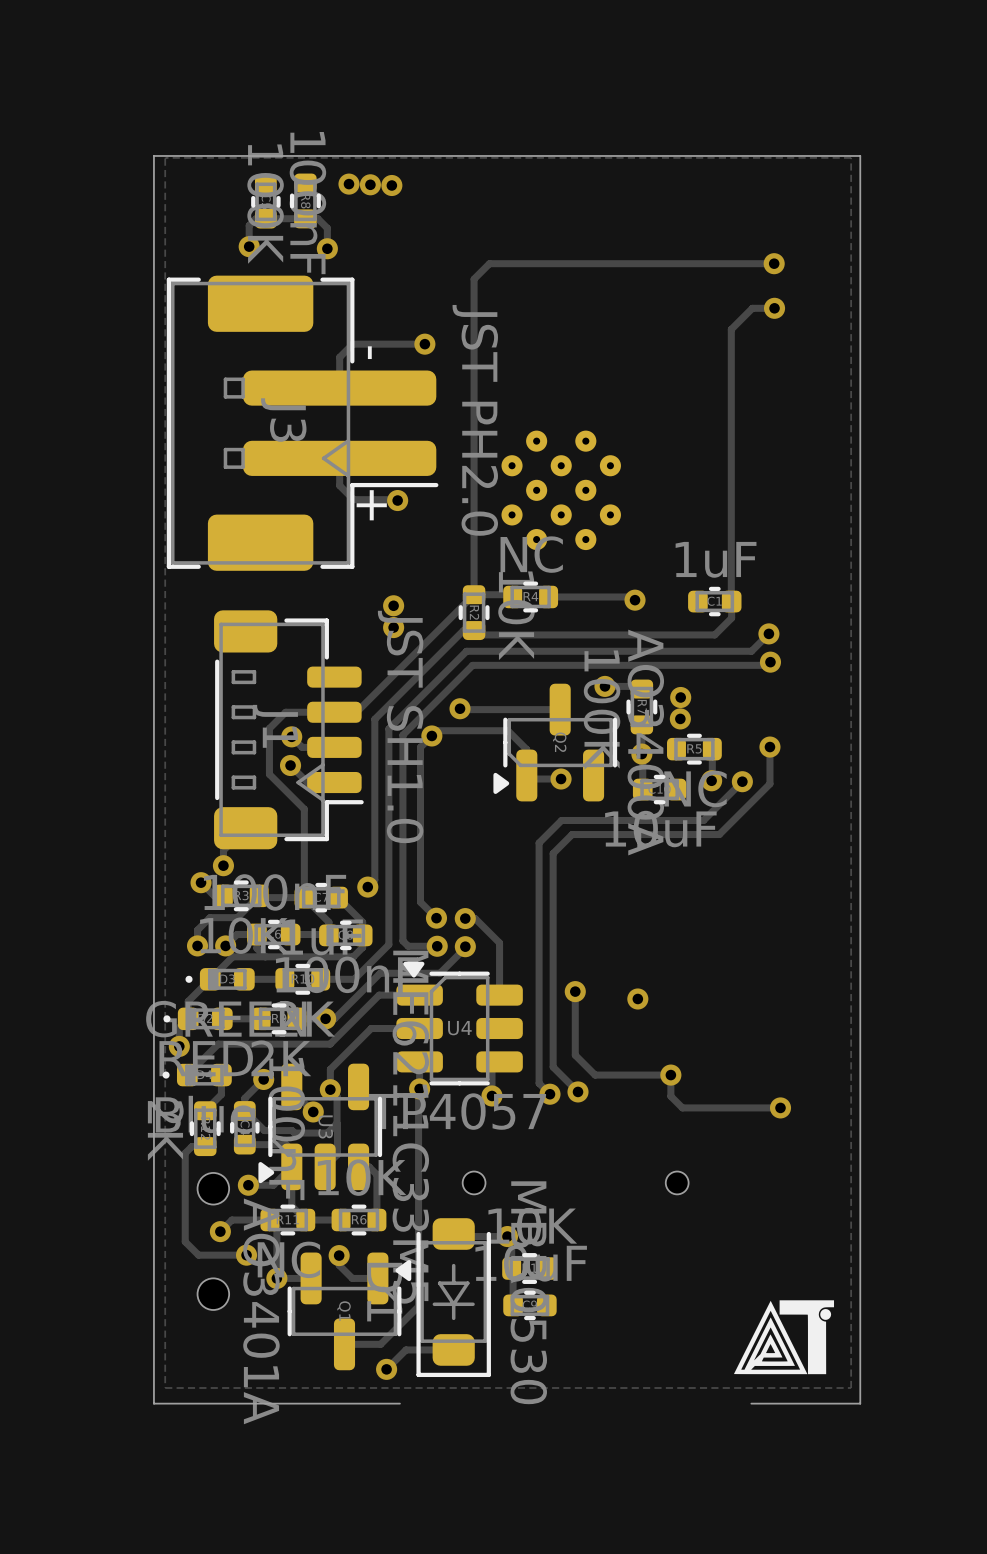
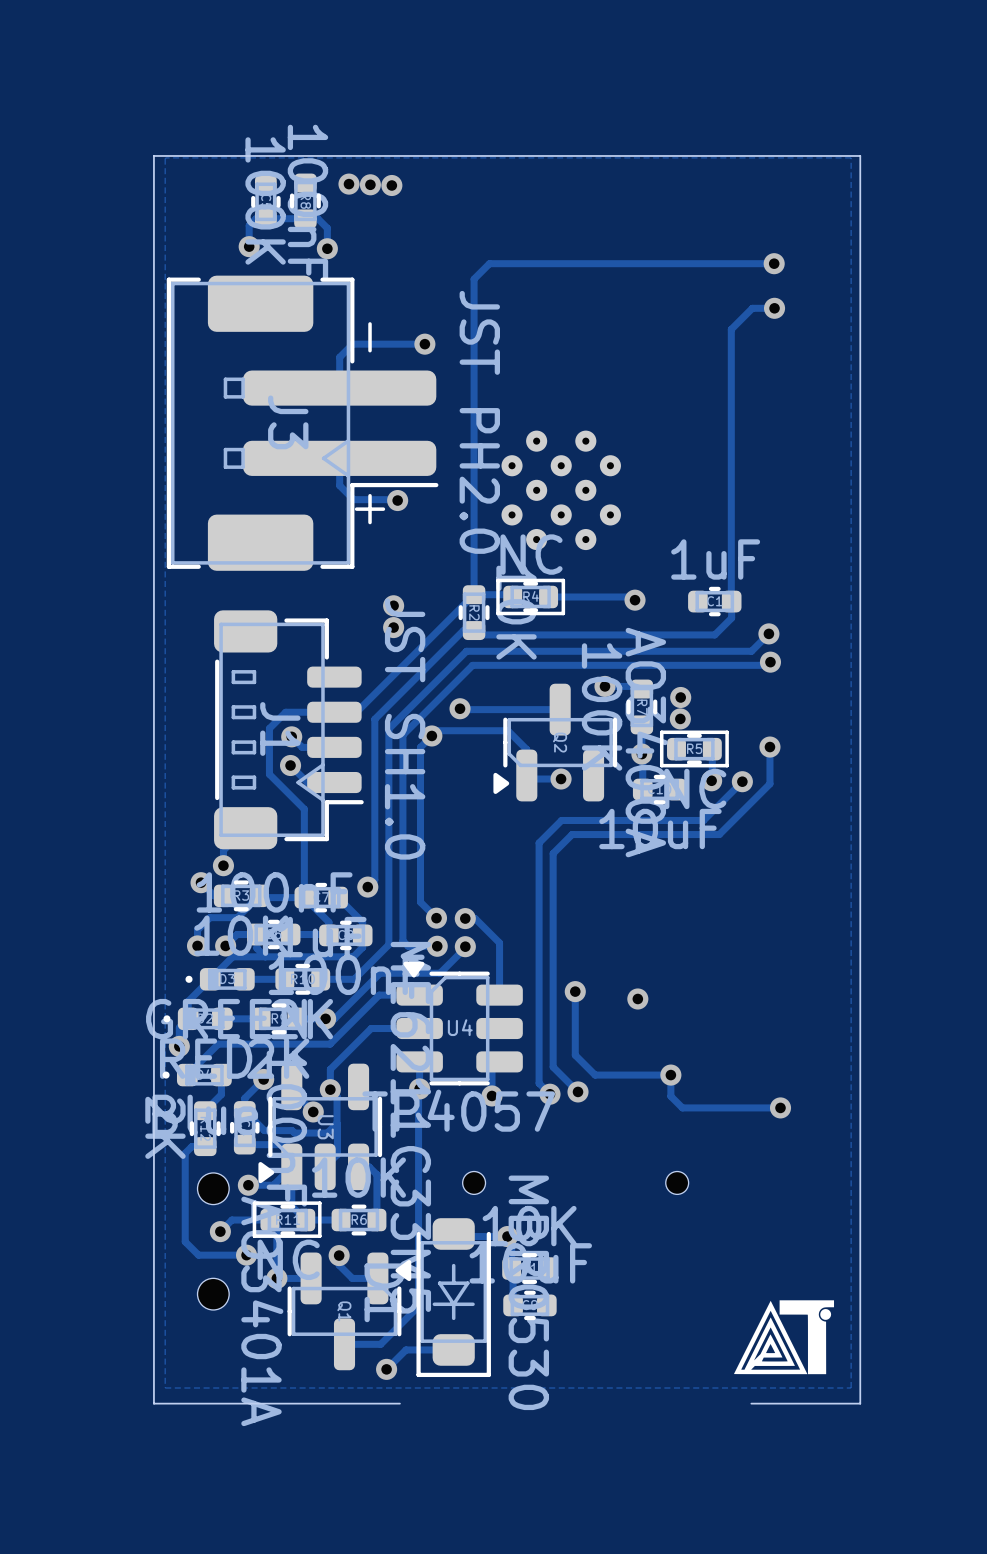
line: none -> (563, 580) (497, 580) (497, 613) (563, 613) (563, 580)
line: none -> (727, 732) (661, 732) (661, 765) (727, 765) (727, 732)
line: none -> (319, 1203) (254, 1203) (254, 1236) (319, 1236) (319, 1203)

